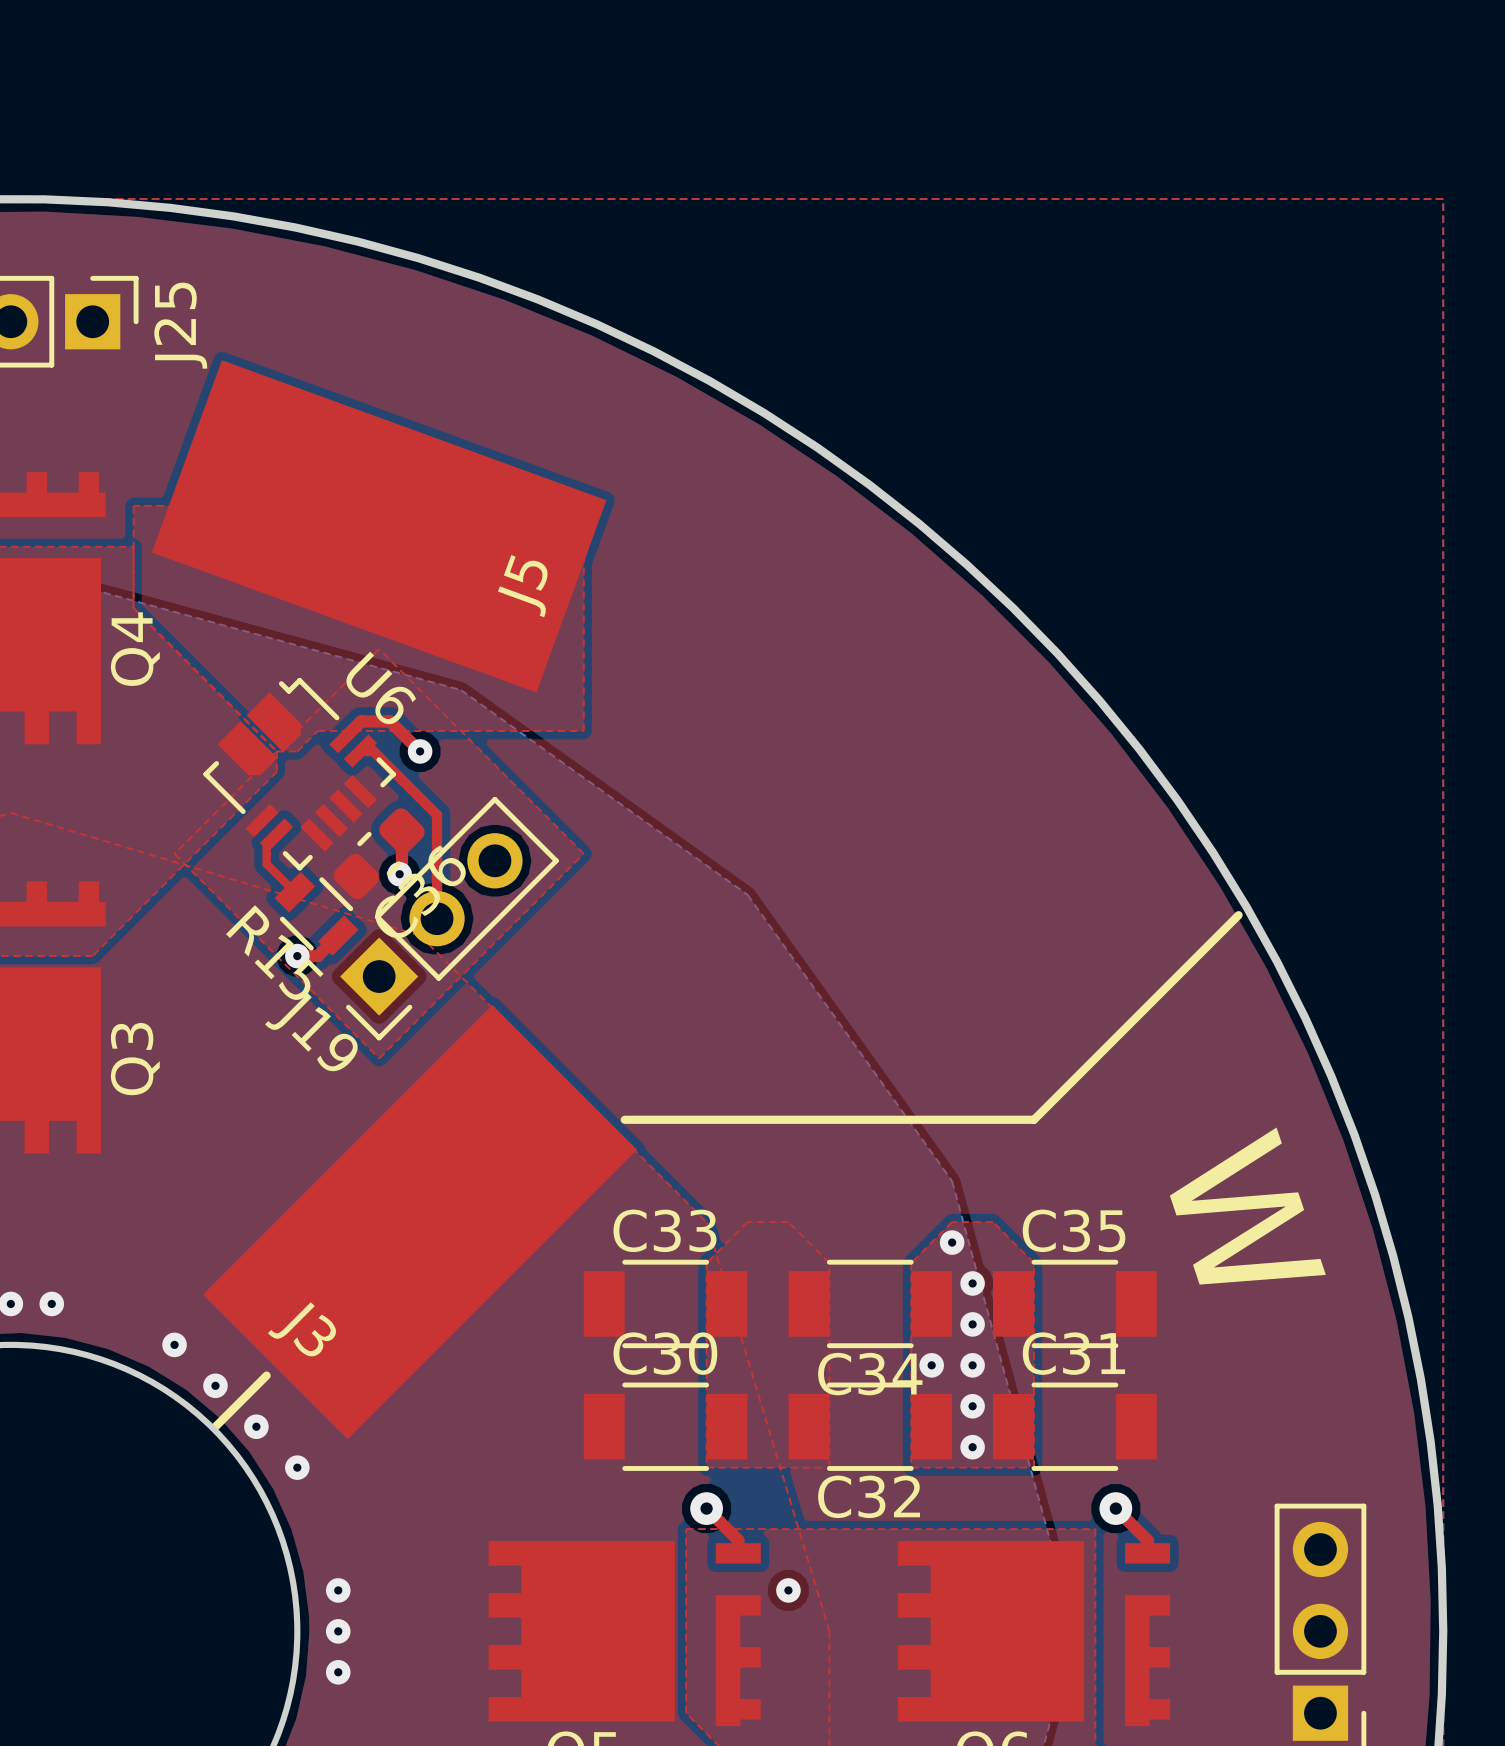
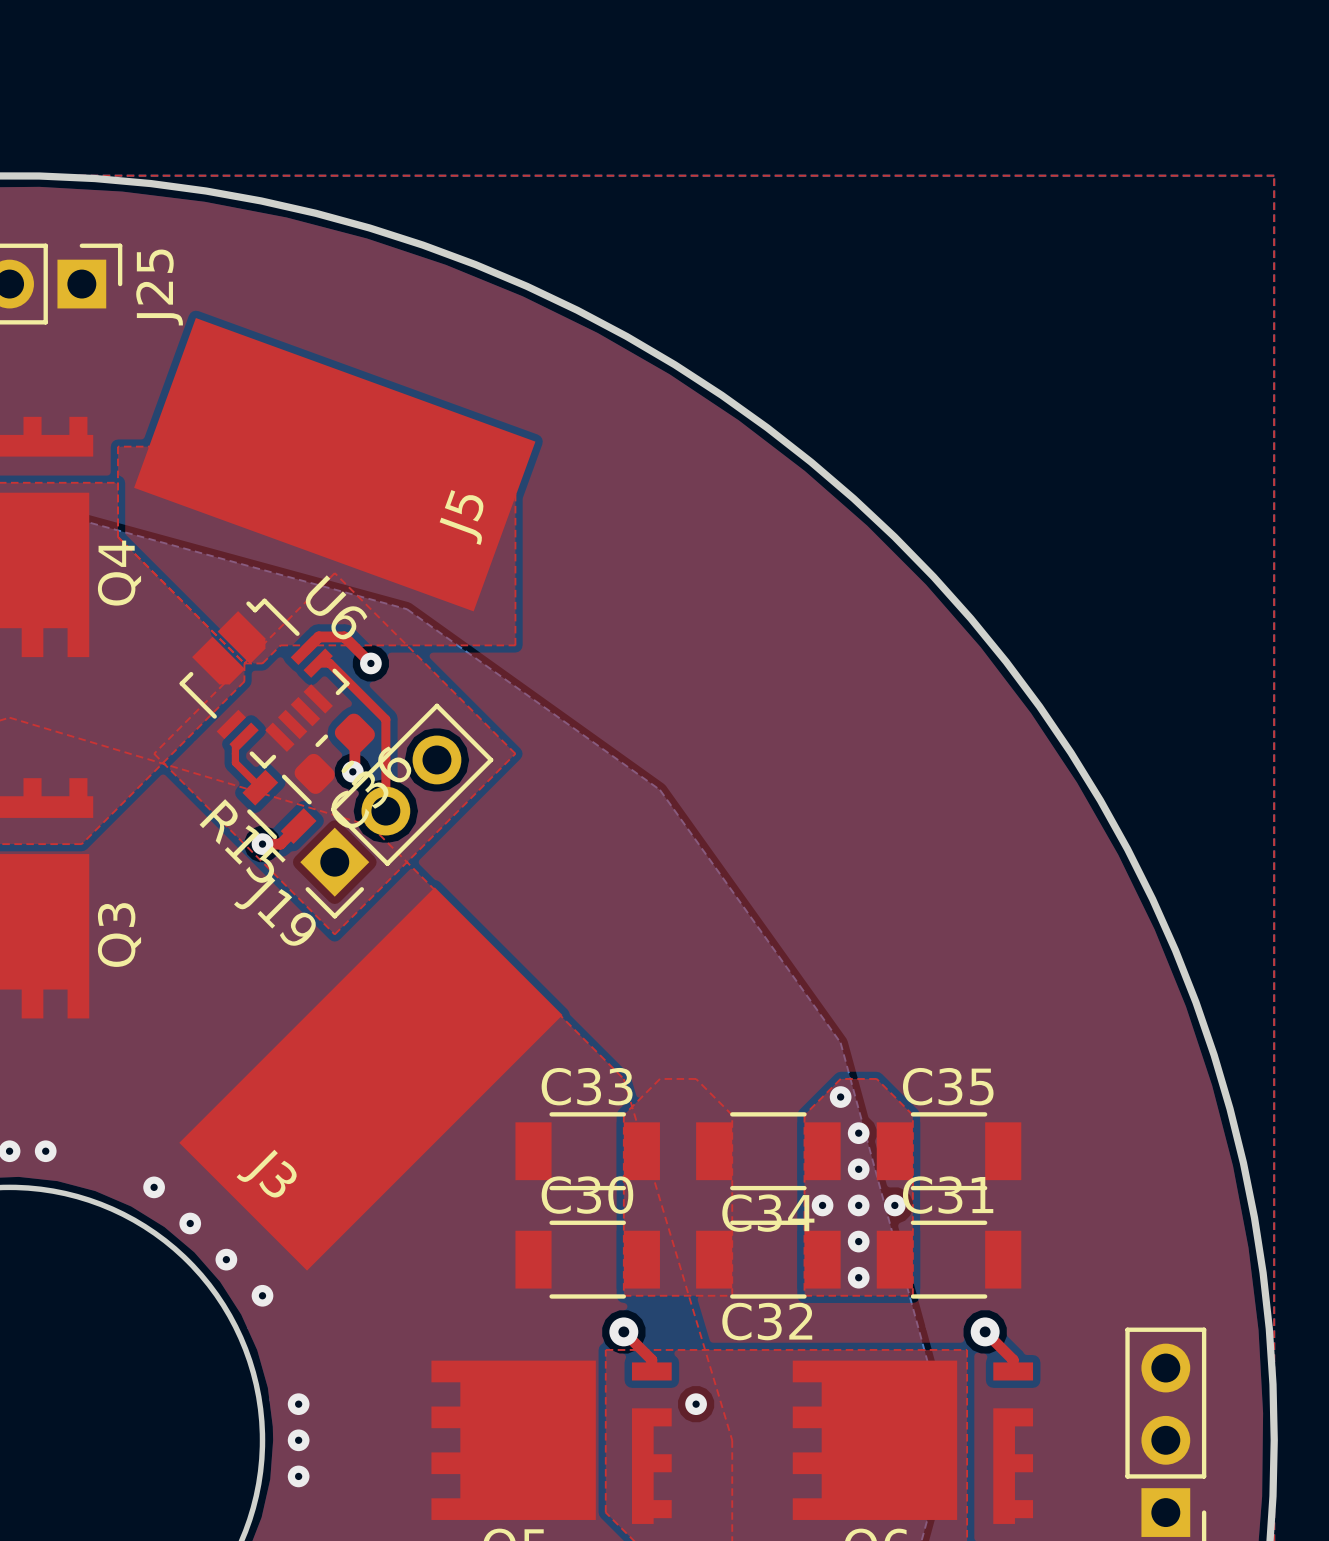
line: (1238, 915) (1033, 1119) (624, 1119) -> none
text: W (1247, 1206) -> none
via: none -> (894, 1205)
line: (266, 1375) (215, 1426) -> none

